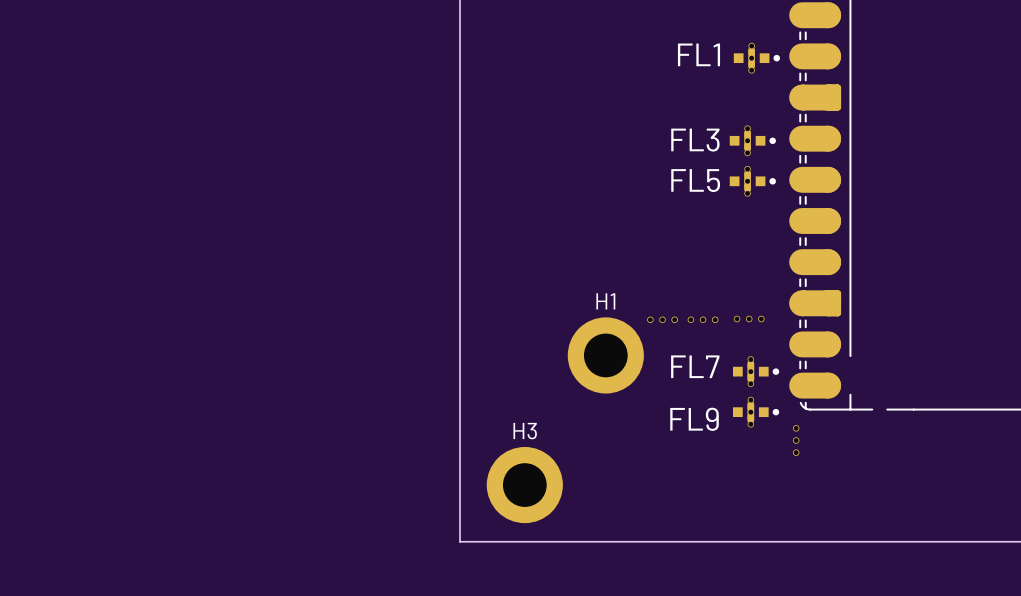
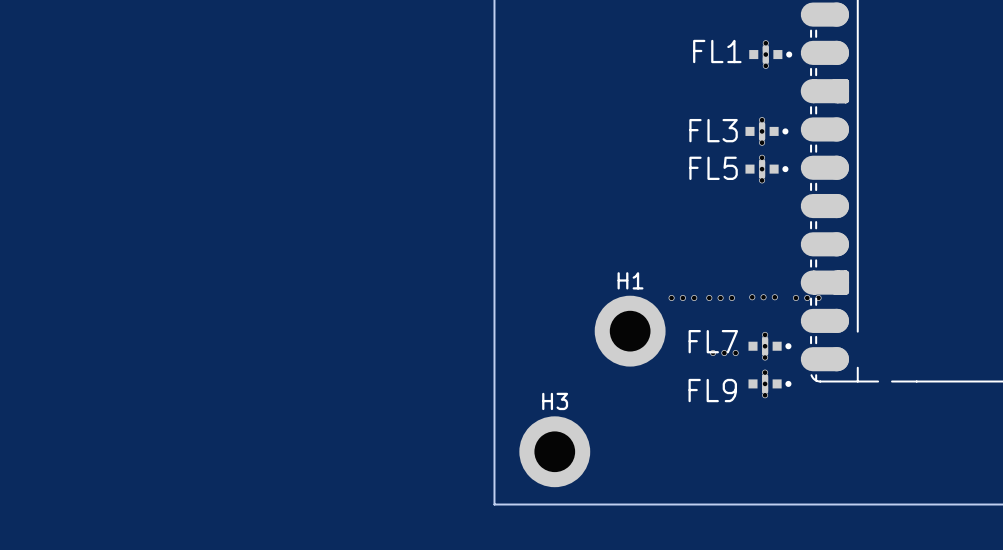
part: none -> (807, 297)
part: none -> (724, 353)
part: (796, 440) -> none

